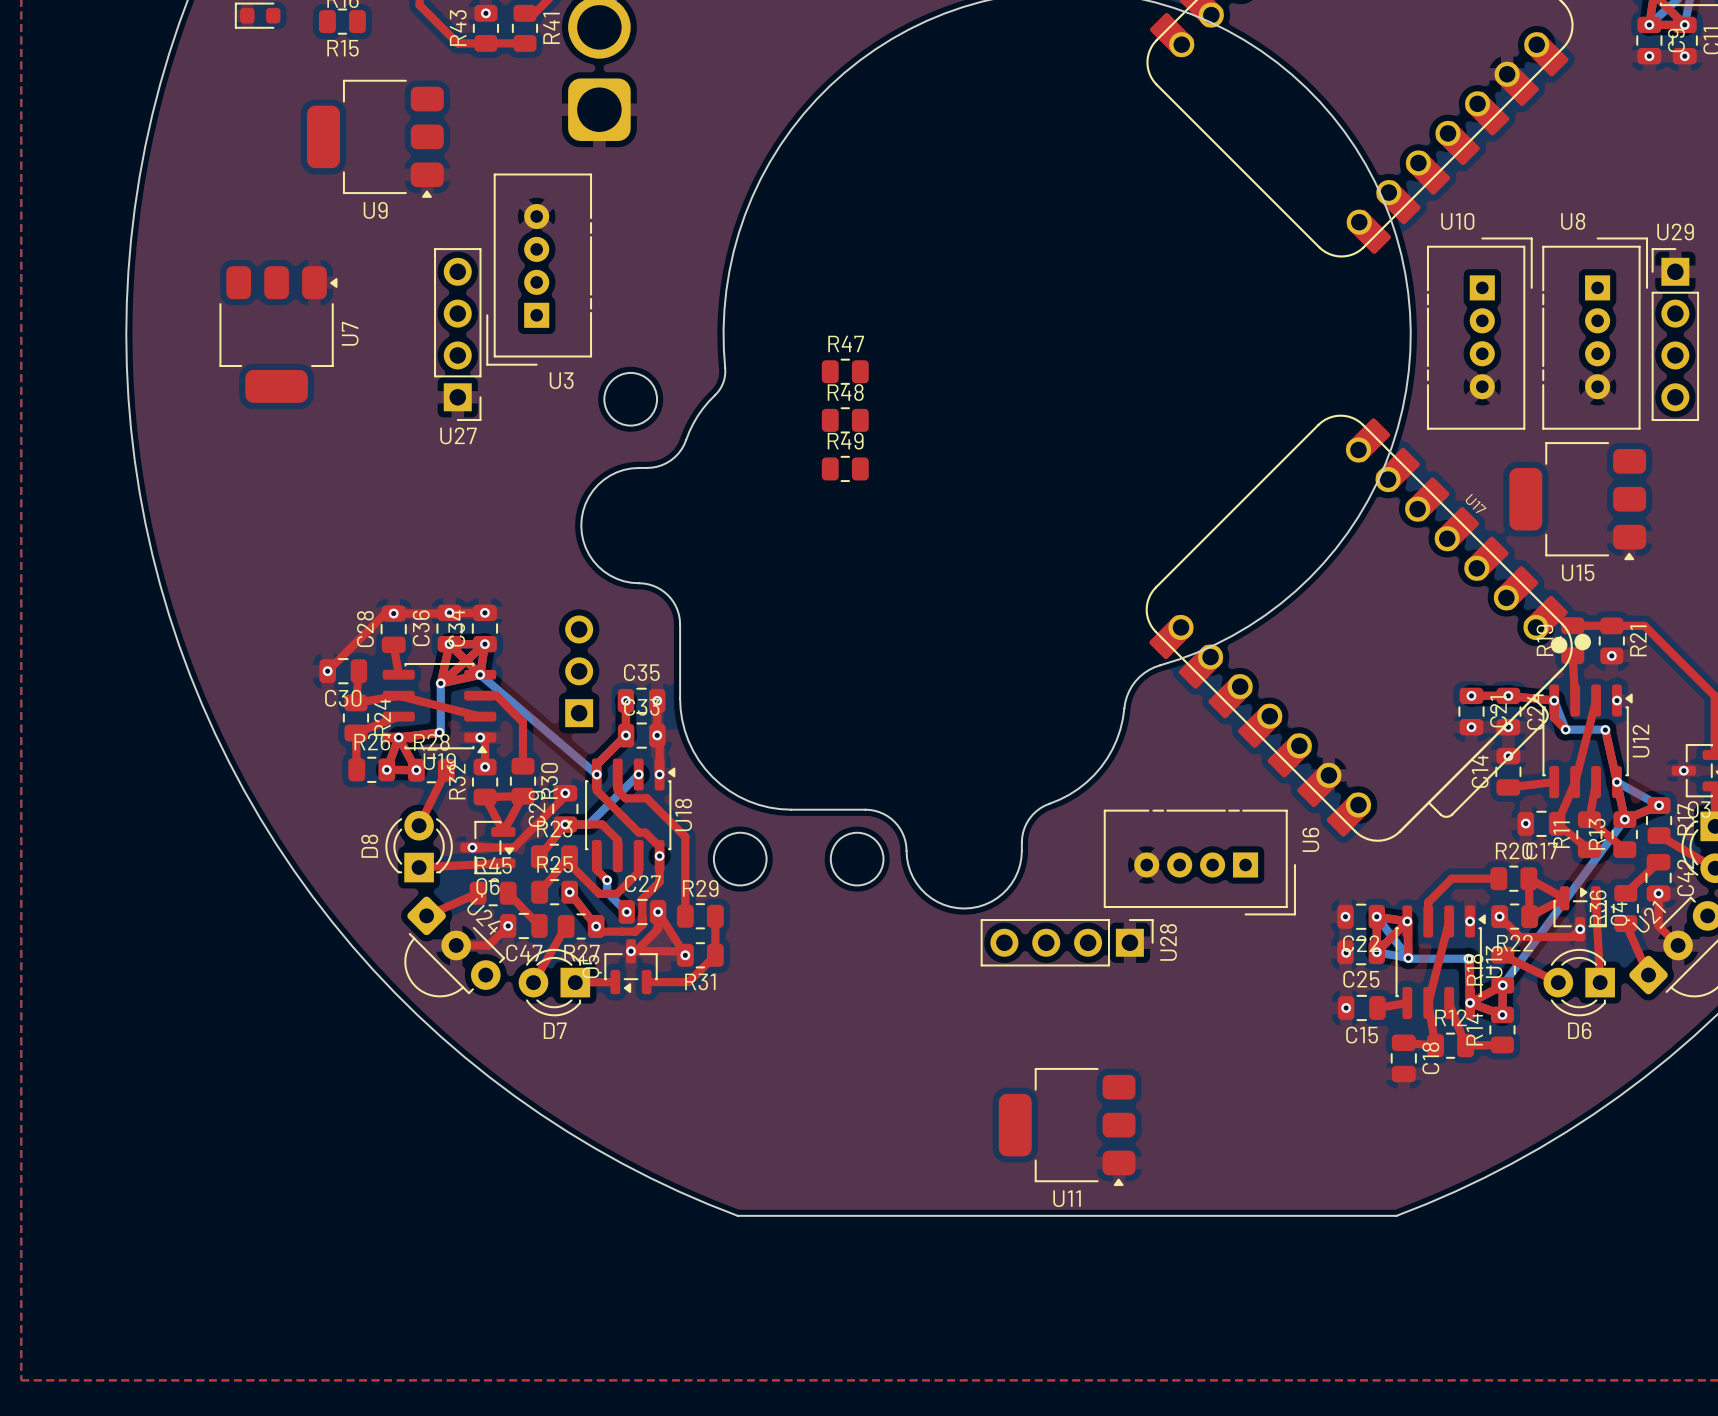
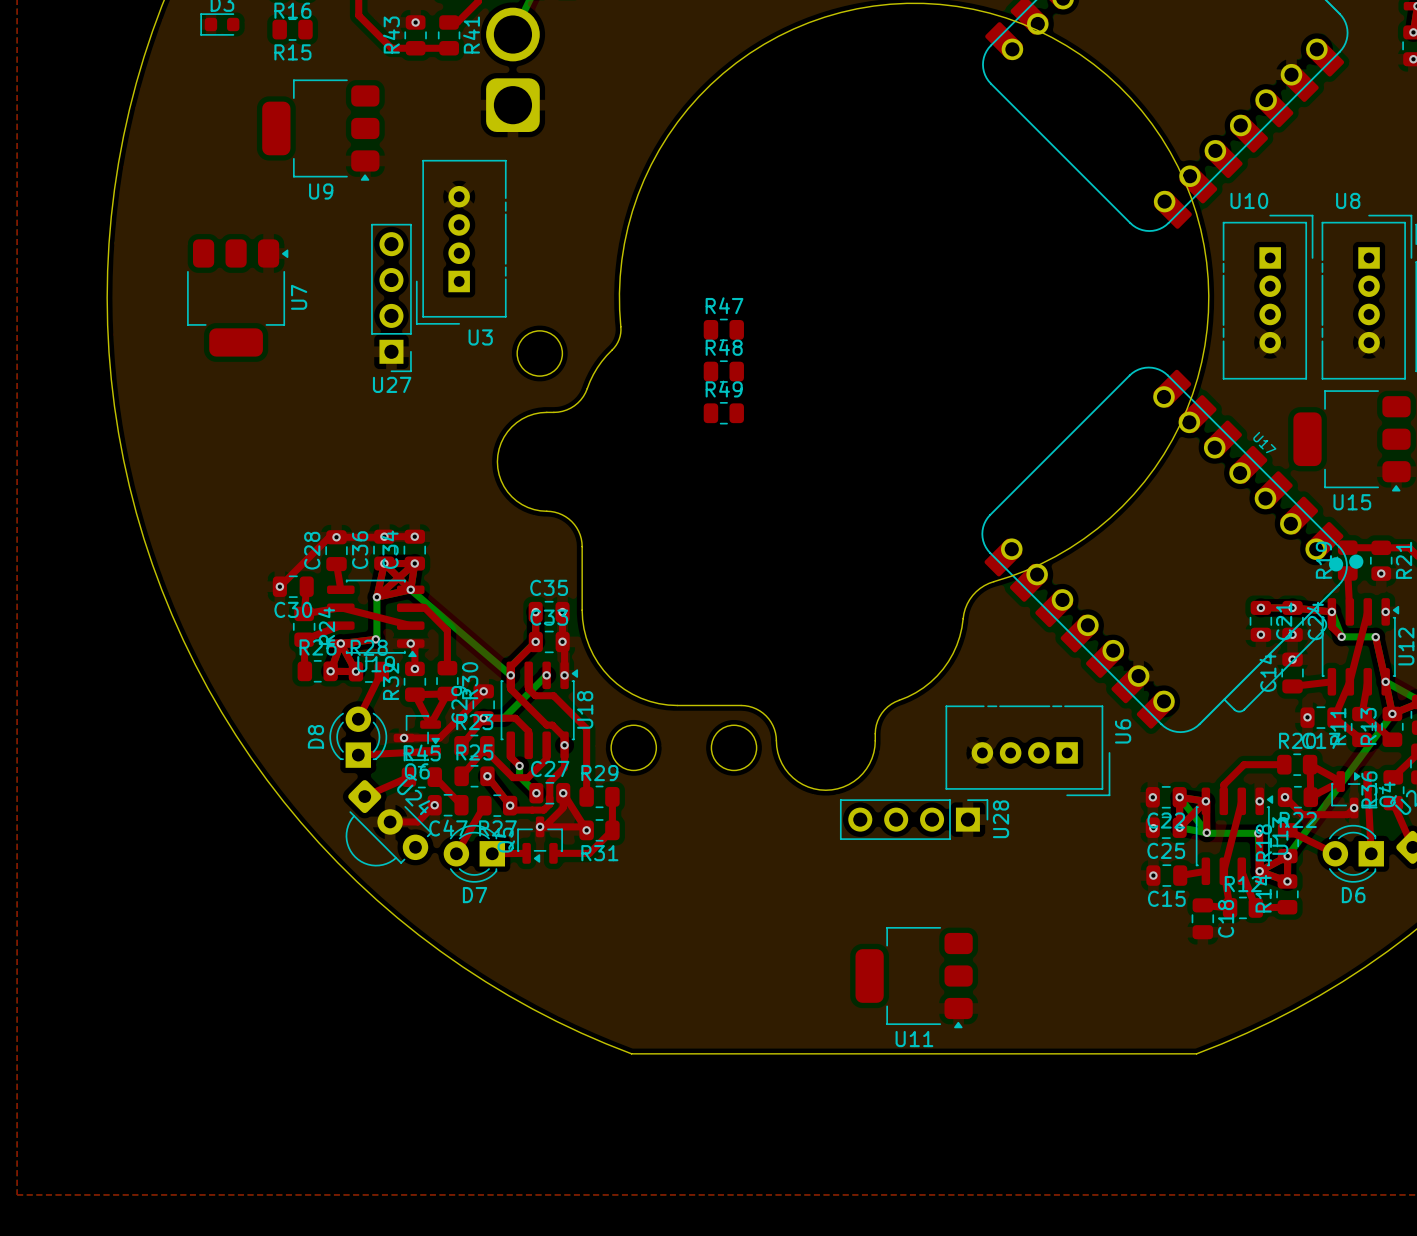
part: (579, 671) -> none

